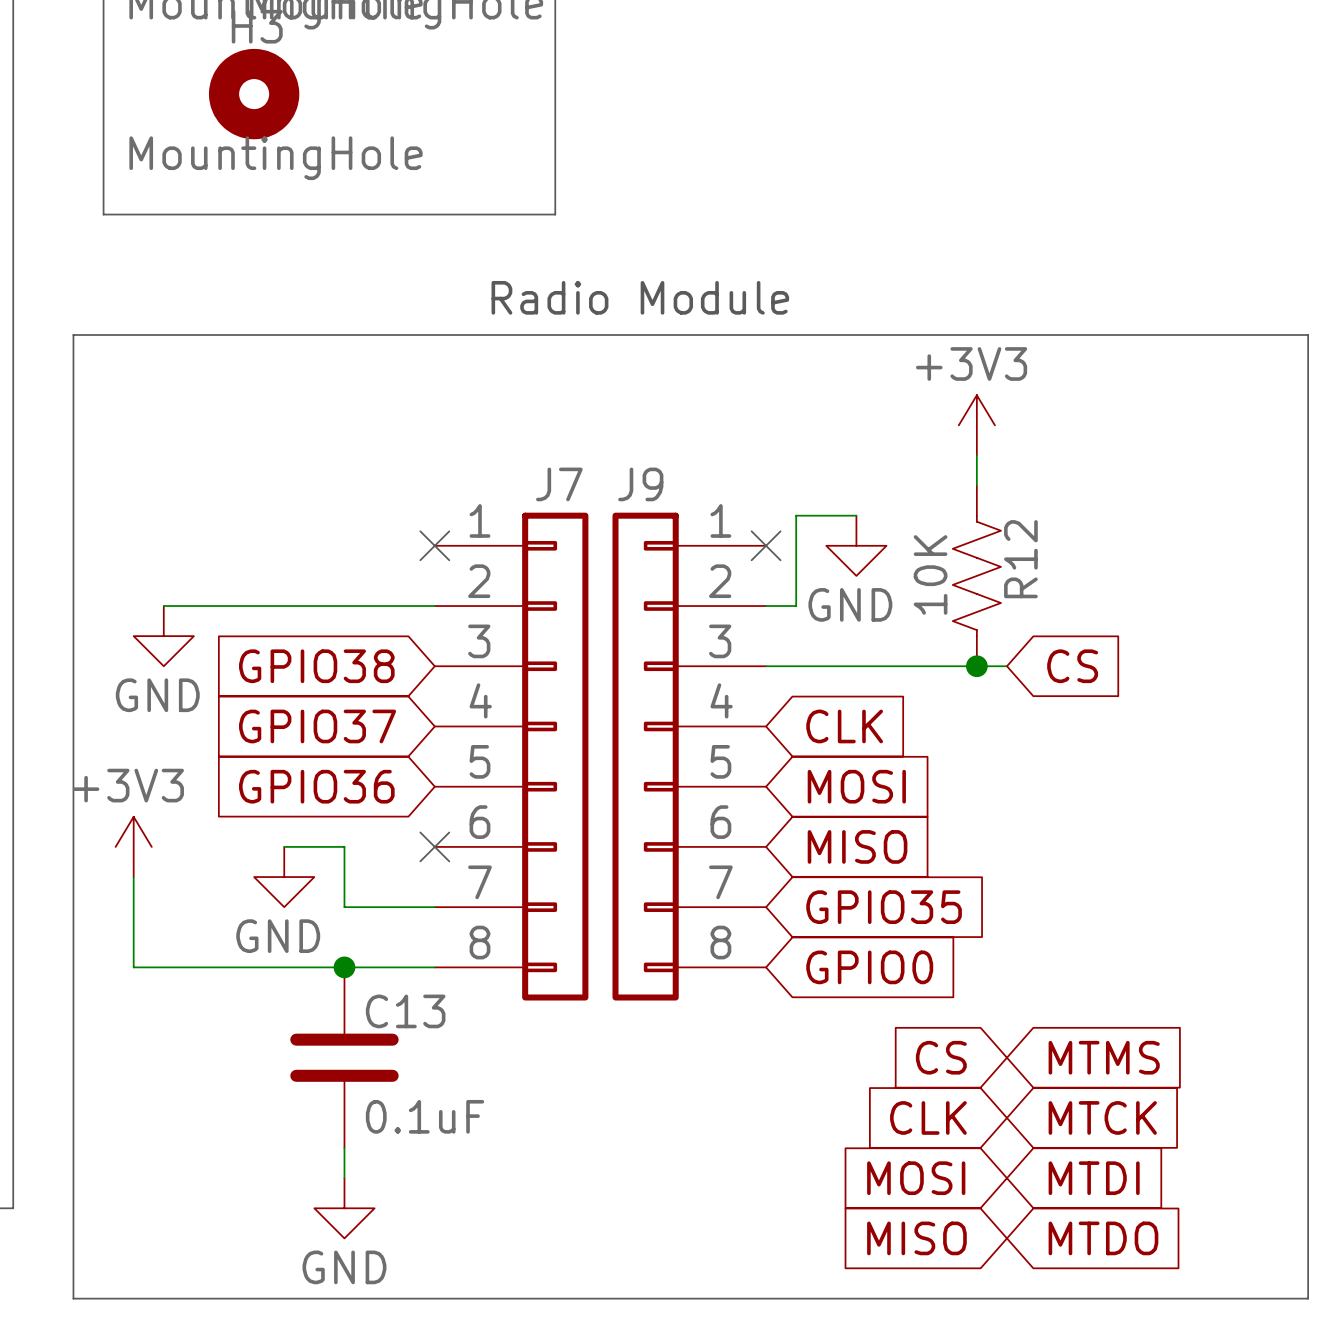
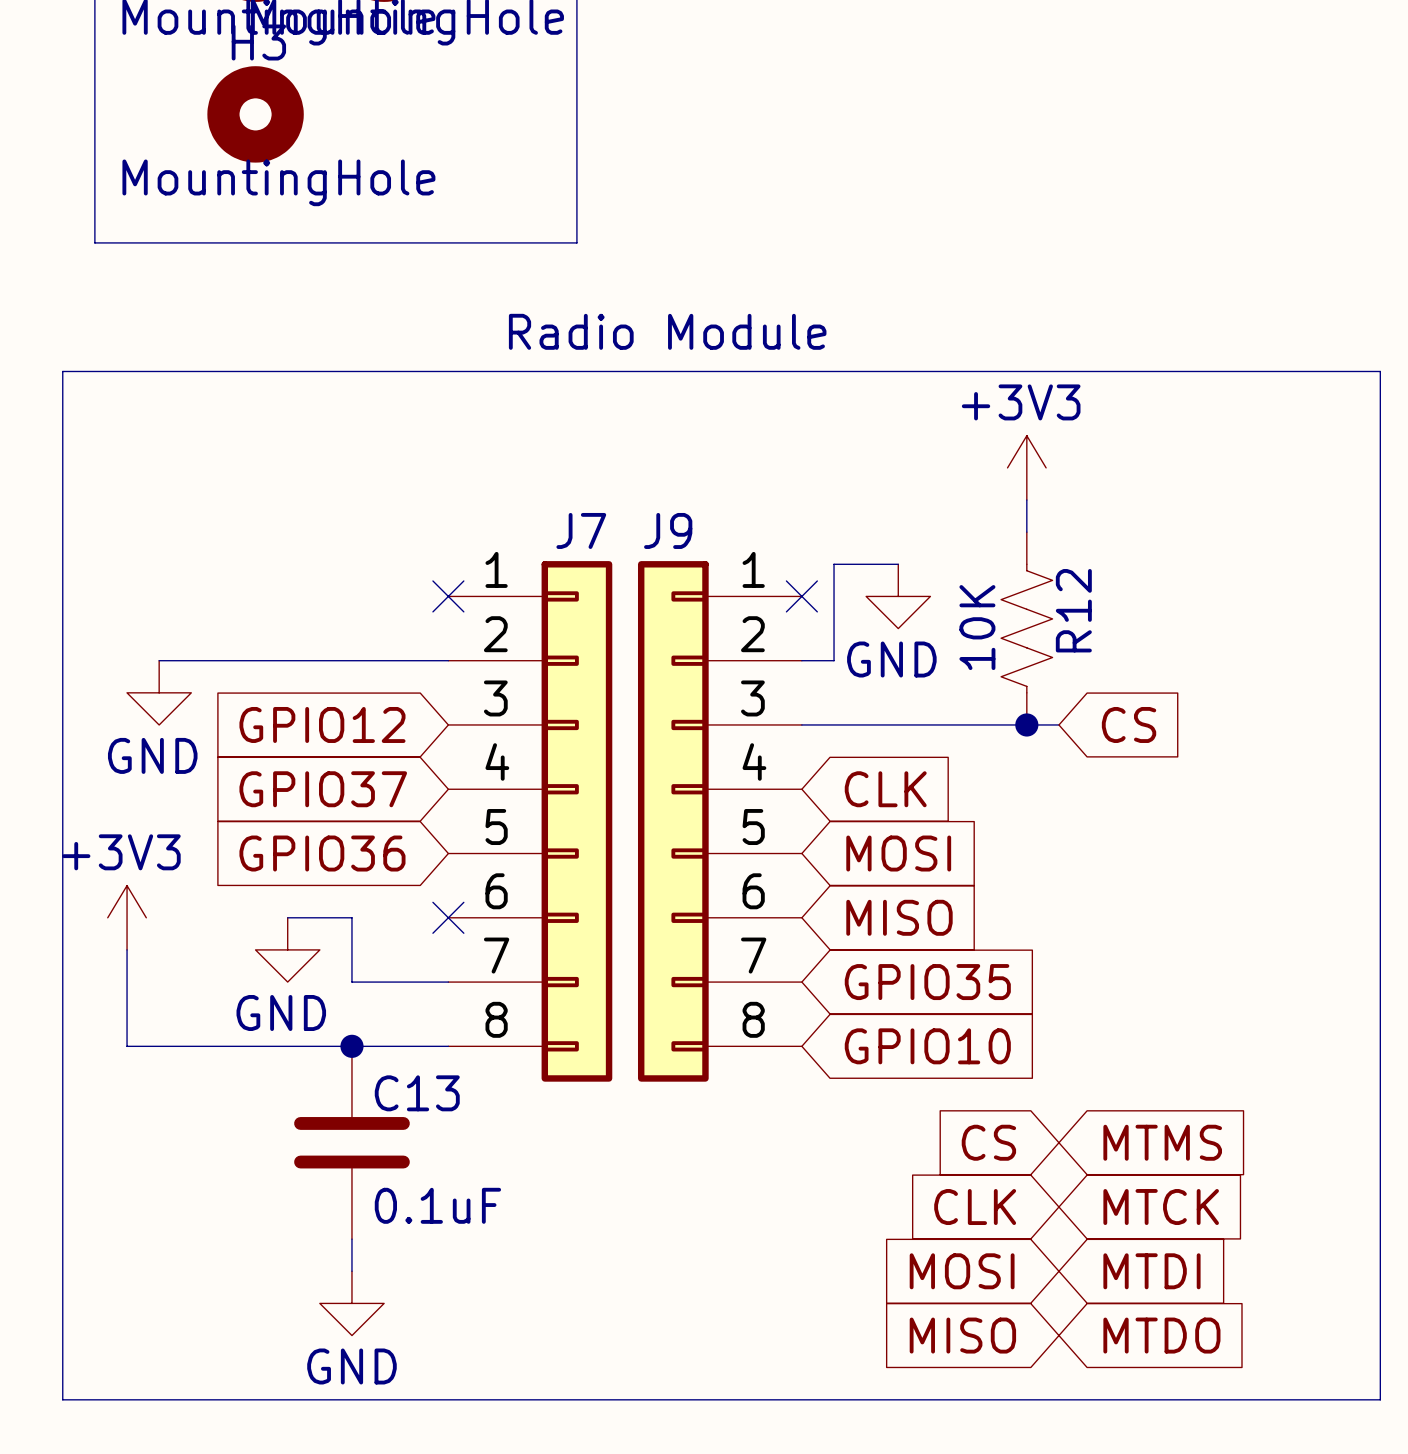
global label: GPIO38 (316, 666) -> GPIO12 (322, 724)
global label: GPIO0 (869, 967) -> GPIO10 (927, 1046)

